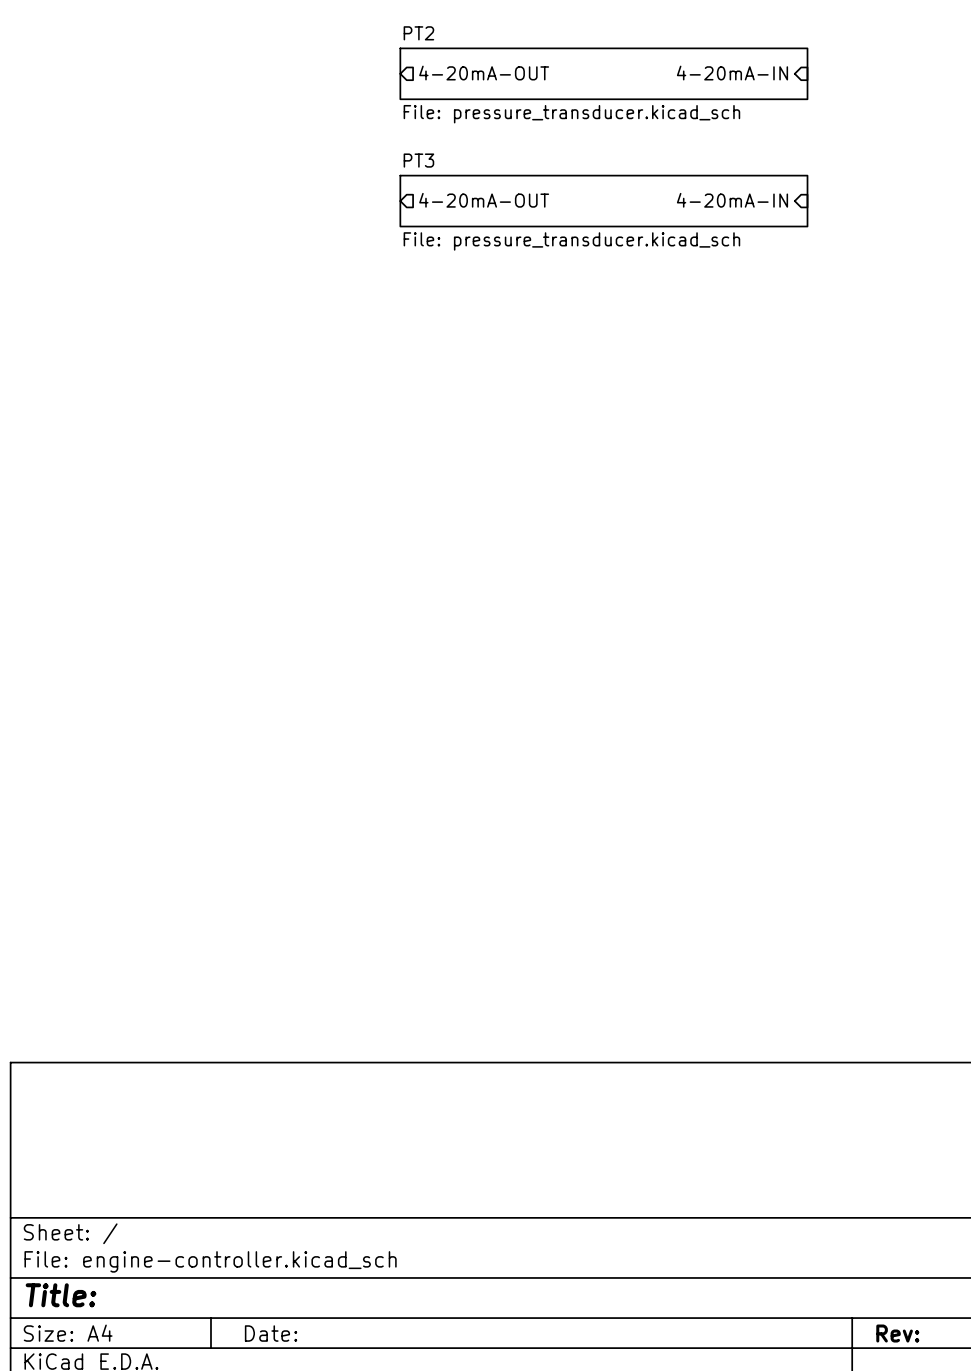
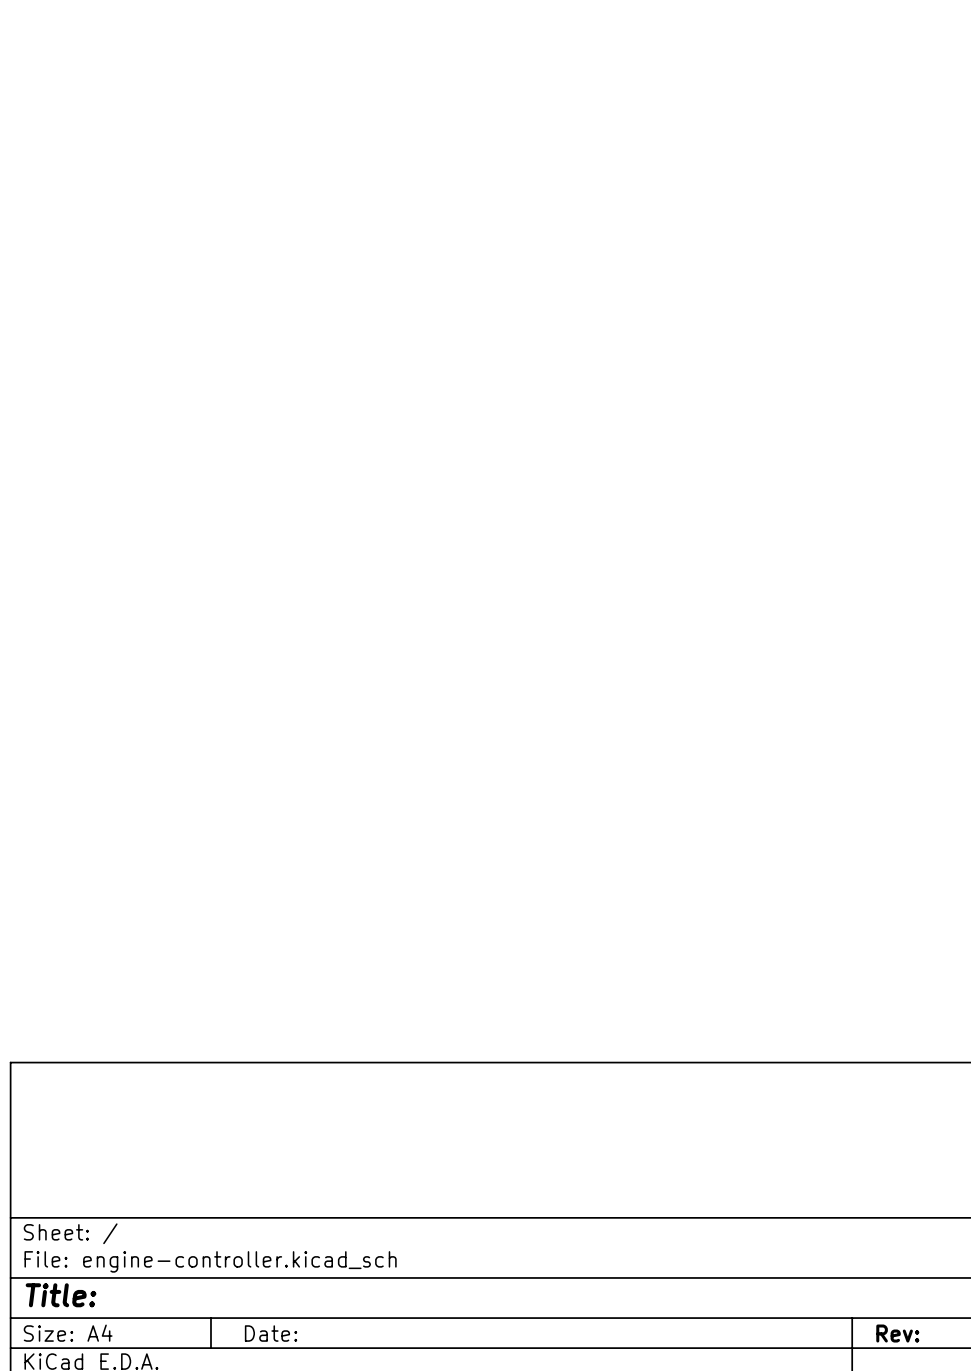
sheet pin: 4-20mA-OUT (484, 73) -> none
sheet PT2: File: pressure_transducer.kicad_sch (603, 73) -> none
sheet pin: 4-20mA-IN (732, 73) -> none
sheet pin: 4-20mA-OUT (484, 200) -> none
sheet pin: 4-20mA-IN (732, 200) -> none
sheet PT3: File: pressure_transducer.kicad_sch (603, 201) -> none

